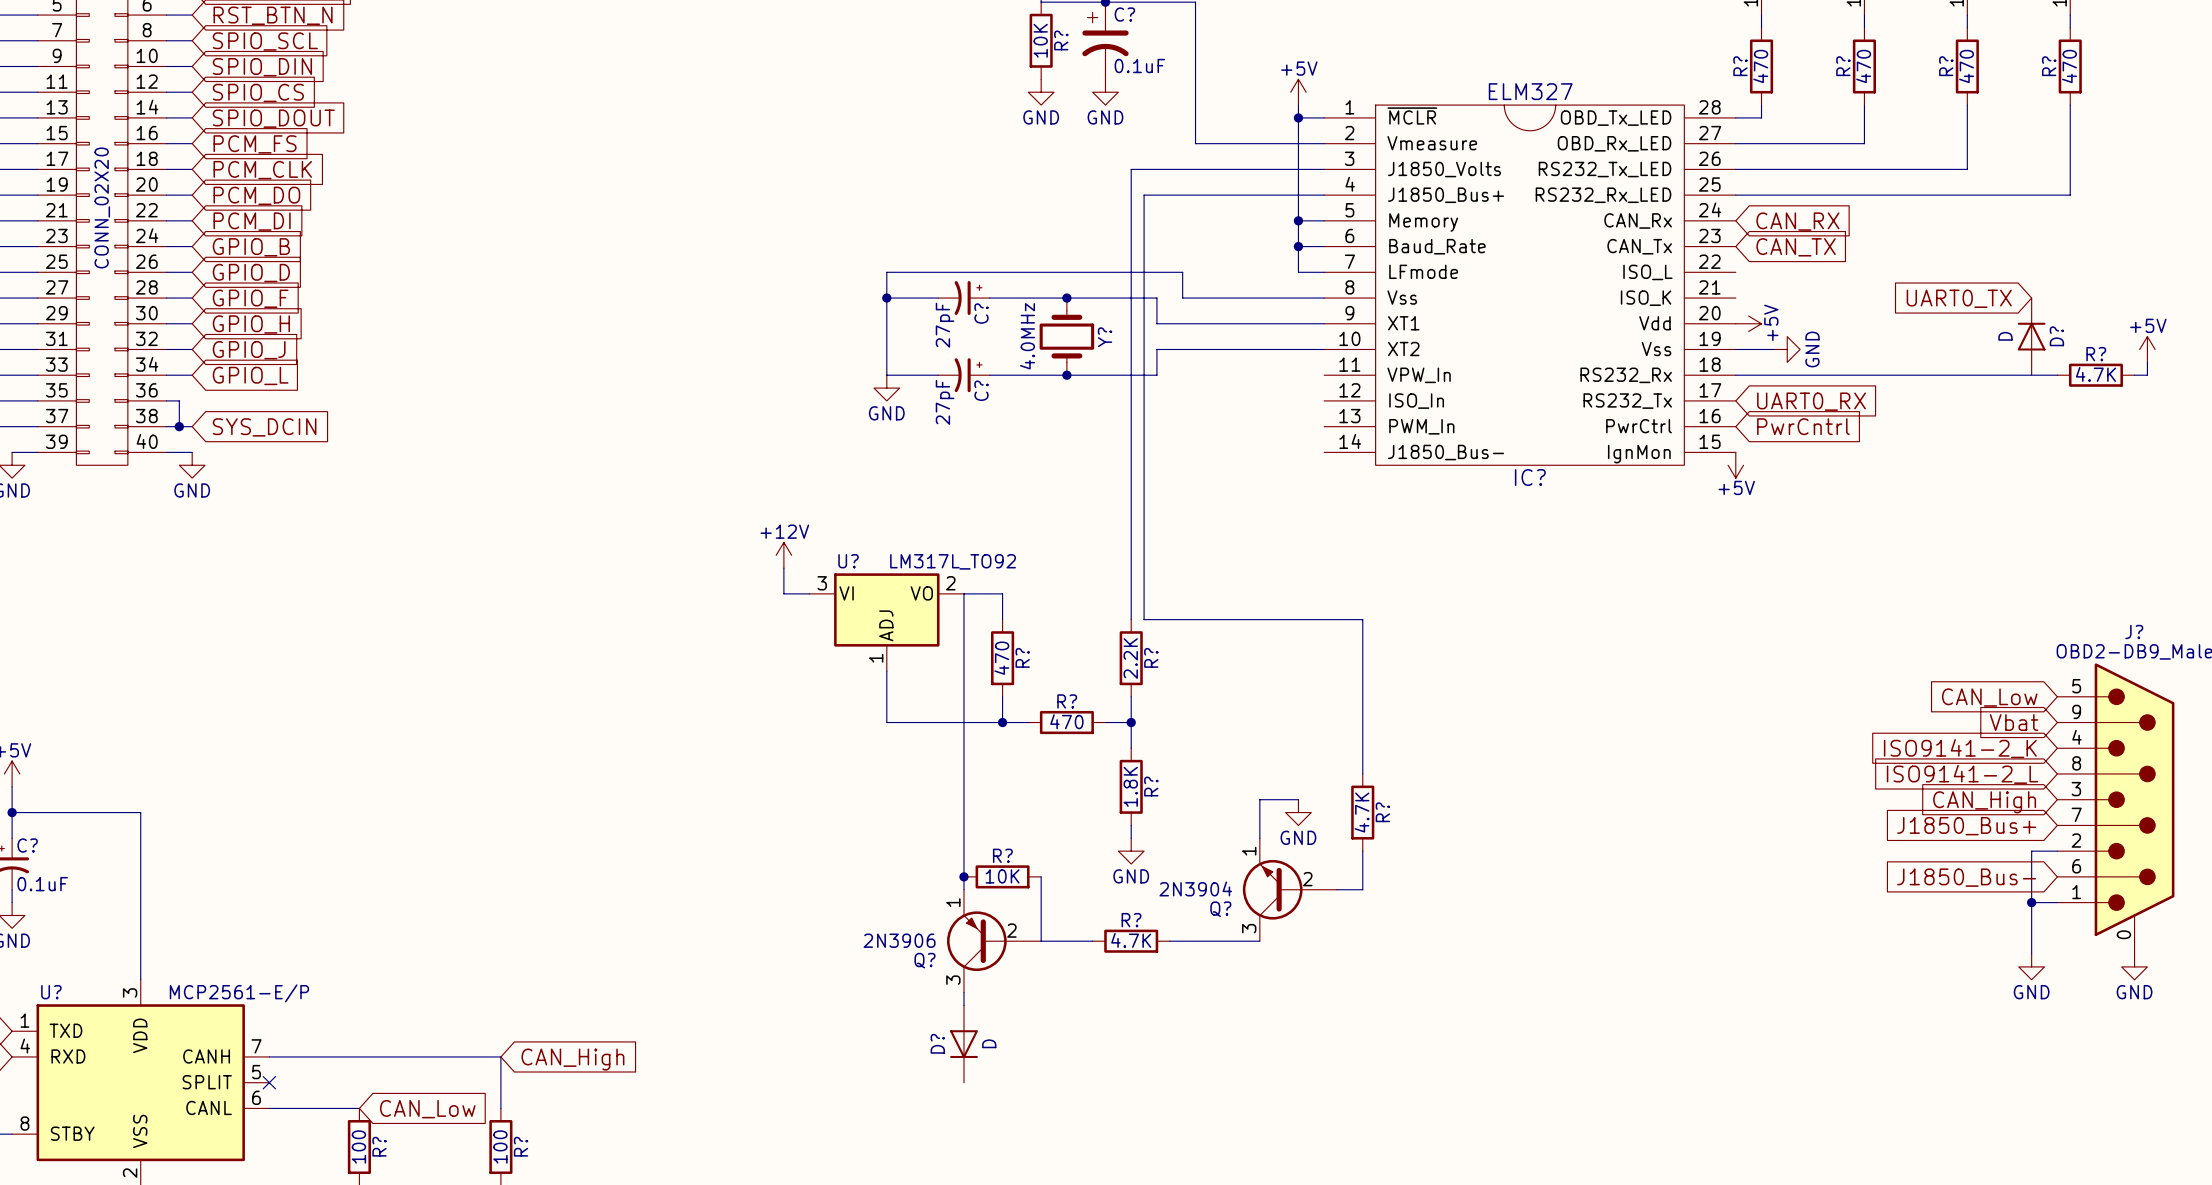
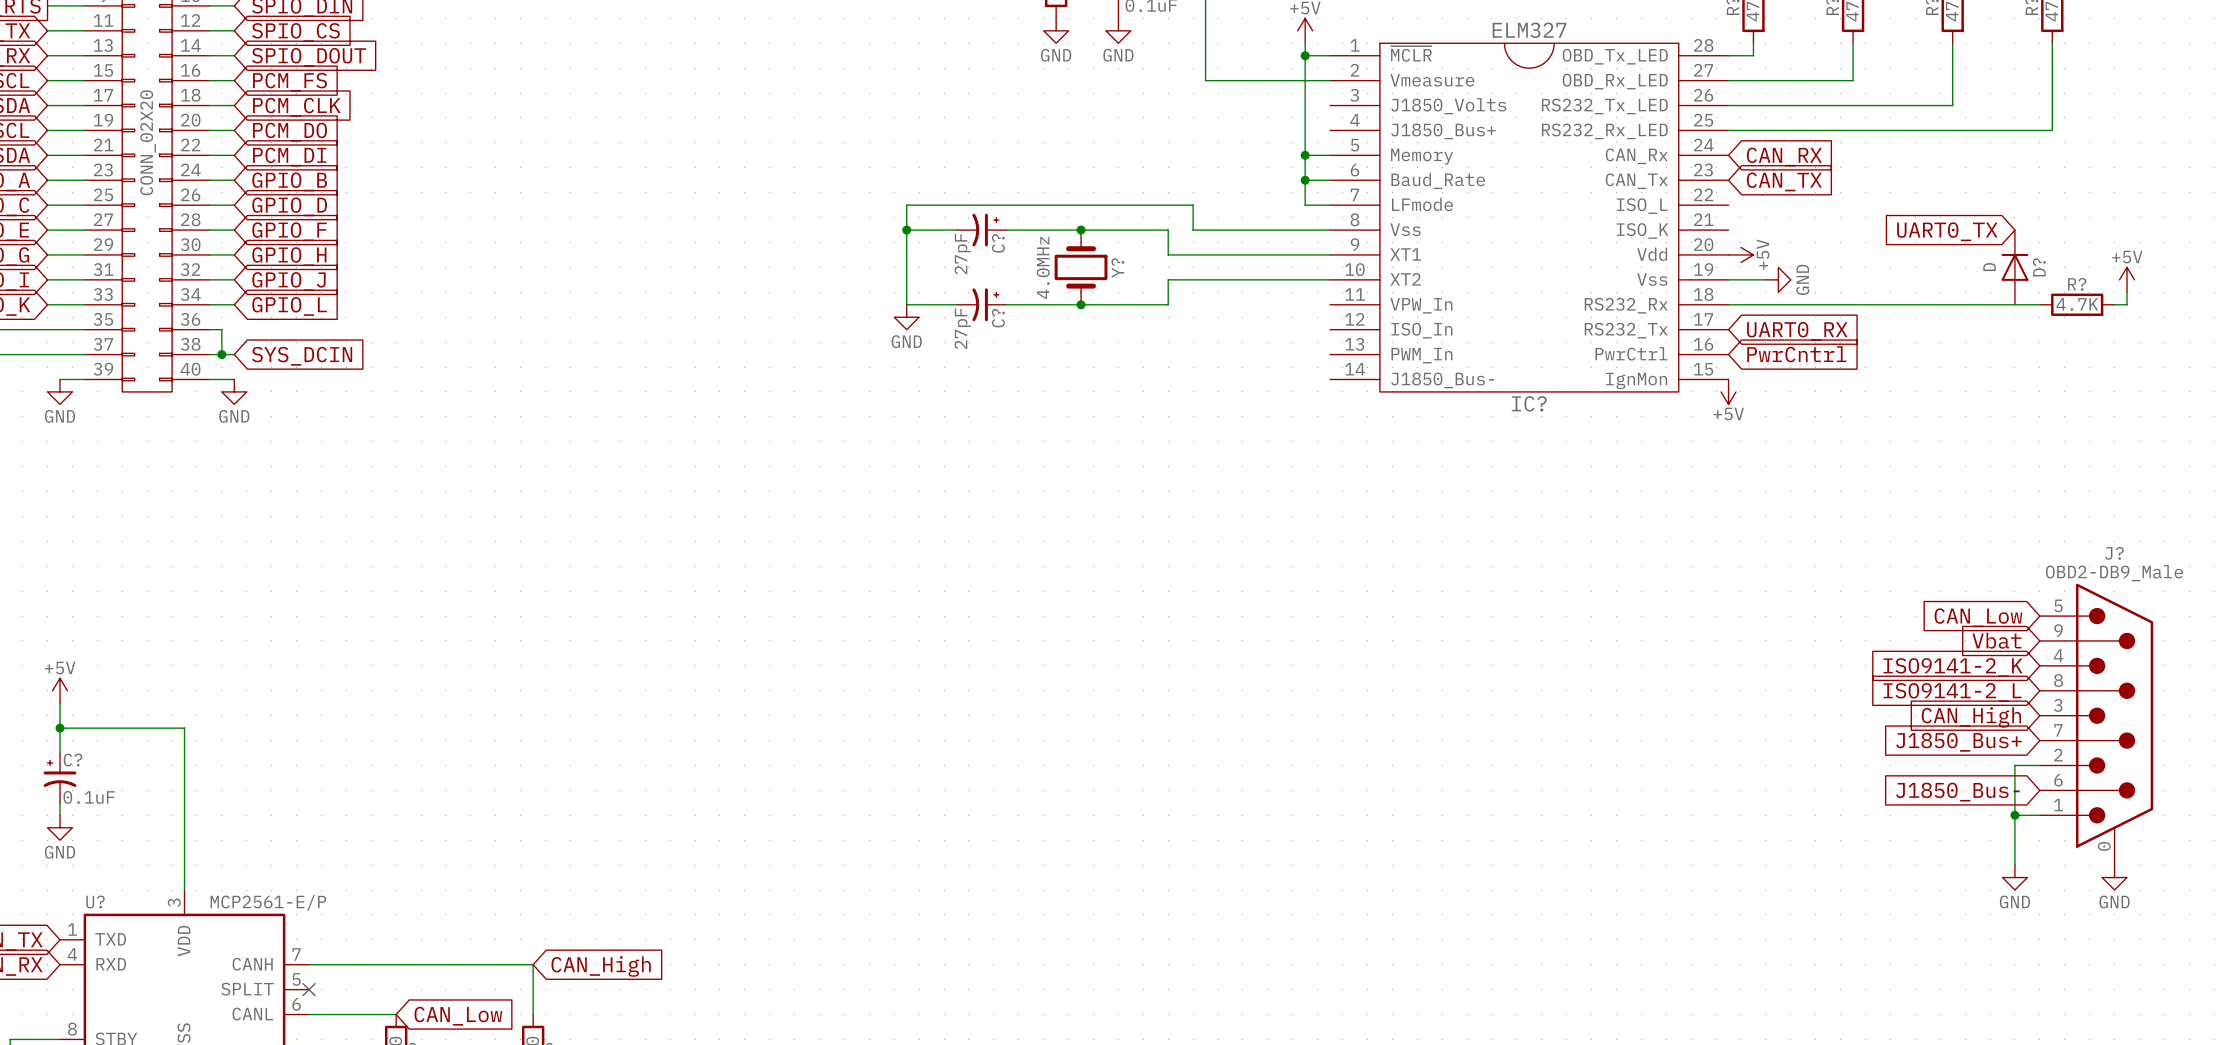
wire: (1324, 169) (1131, 169) (1131, 619) -> none
wire: (1324, 195) (1144, 195) (1144, 619) (1362, 619) (1362, 773) -> none
power symbol: +12V (783, 555) -> none
wire: (783, 568) (783, 593) (809, 593) -> none
wire: (1002, 619) (1002, 593) (963, 593) (963, 889) -> none
U?: LM317L_TO92 (886, 622) -> none
R?: 470 (1002, 658) -> none
R?: 2.2K (1131, 658) -> none
wire: (886, 671) (886, 722) (1028, 722) -> none
wire: (1002, 696) (1002, 722) -> none
wire: (1131, 696) (1131, 748) -> none
junction: (1002, 722) -> none
R?: 470 (1066, 722) -> none
wire: (1105, 722) (1131, 722) -> none
junction: (1131, 722) -> none
R?: 1.8K (1131, 786) -> none
wire: (1298, 799) (1259, 799) (1259, 838) -> none
power symbol: GND (1298, 812) -> none
R?: 4.7K (1362, 812) -> none
wire: (1131, 825) (1131, 838) -> none
power symbol: GND (1131, 851) -> none
wire: (1362, 851) (1362, 889) (1337, 889) -> none
junction: (963, 876) -> none
R?: 10K (1002, 876) -> none
wire: (1041, 876) (1041, 941) (1092, 941) -> none
Q?: 2N3904 (1289, 889) -> none
Q?: 2N3906 (994, 941) -> none
R?: 4.7K (1131, 941) -> none
wire: (1169, 941) (1259, 941) -> none
wire: (963, 992) (963, 1005) -> none
D?: D (963, 1044) -> none

